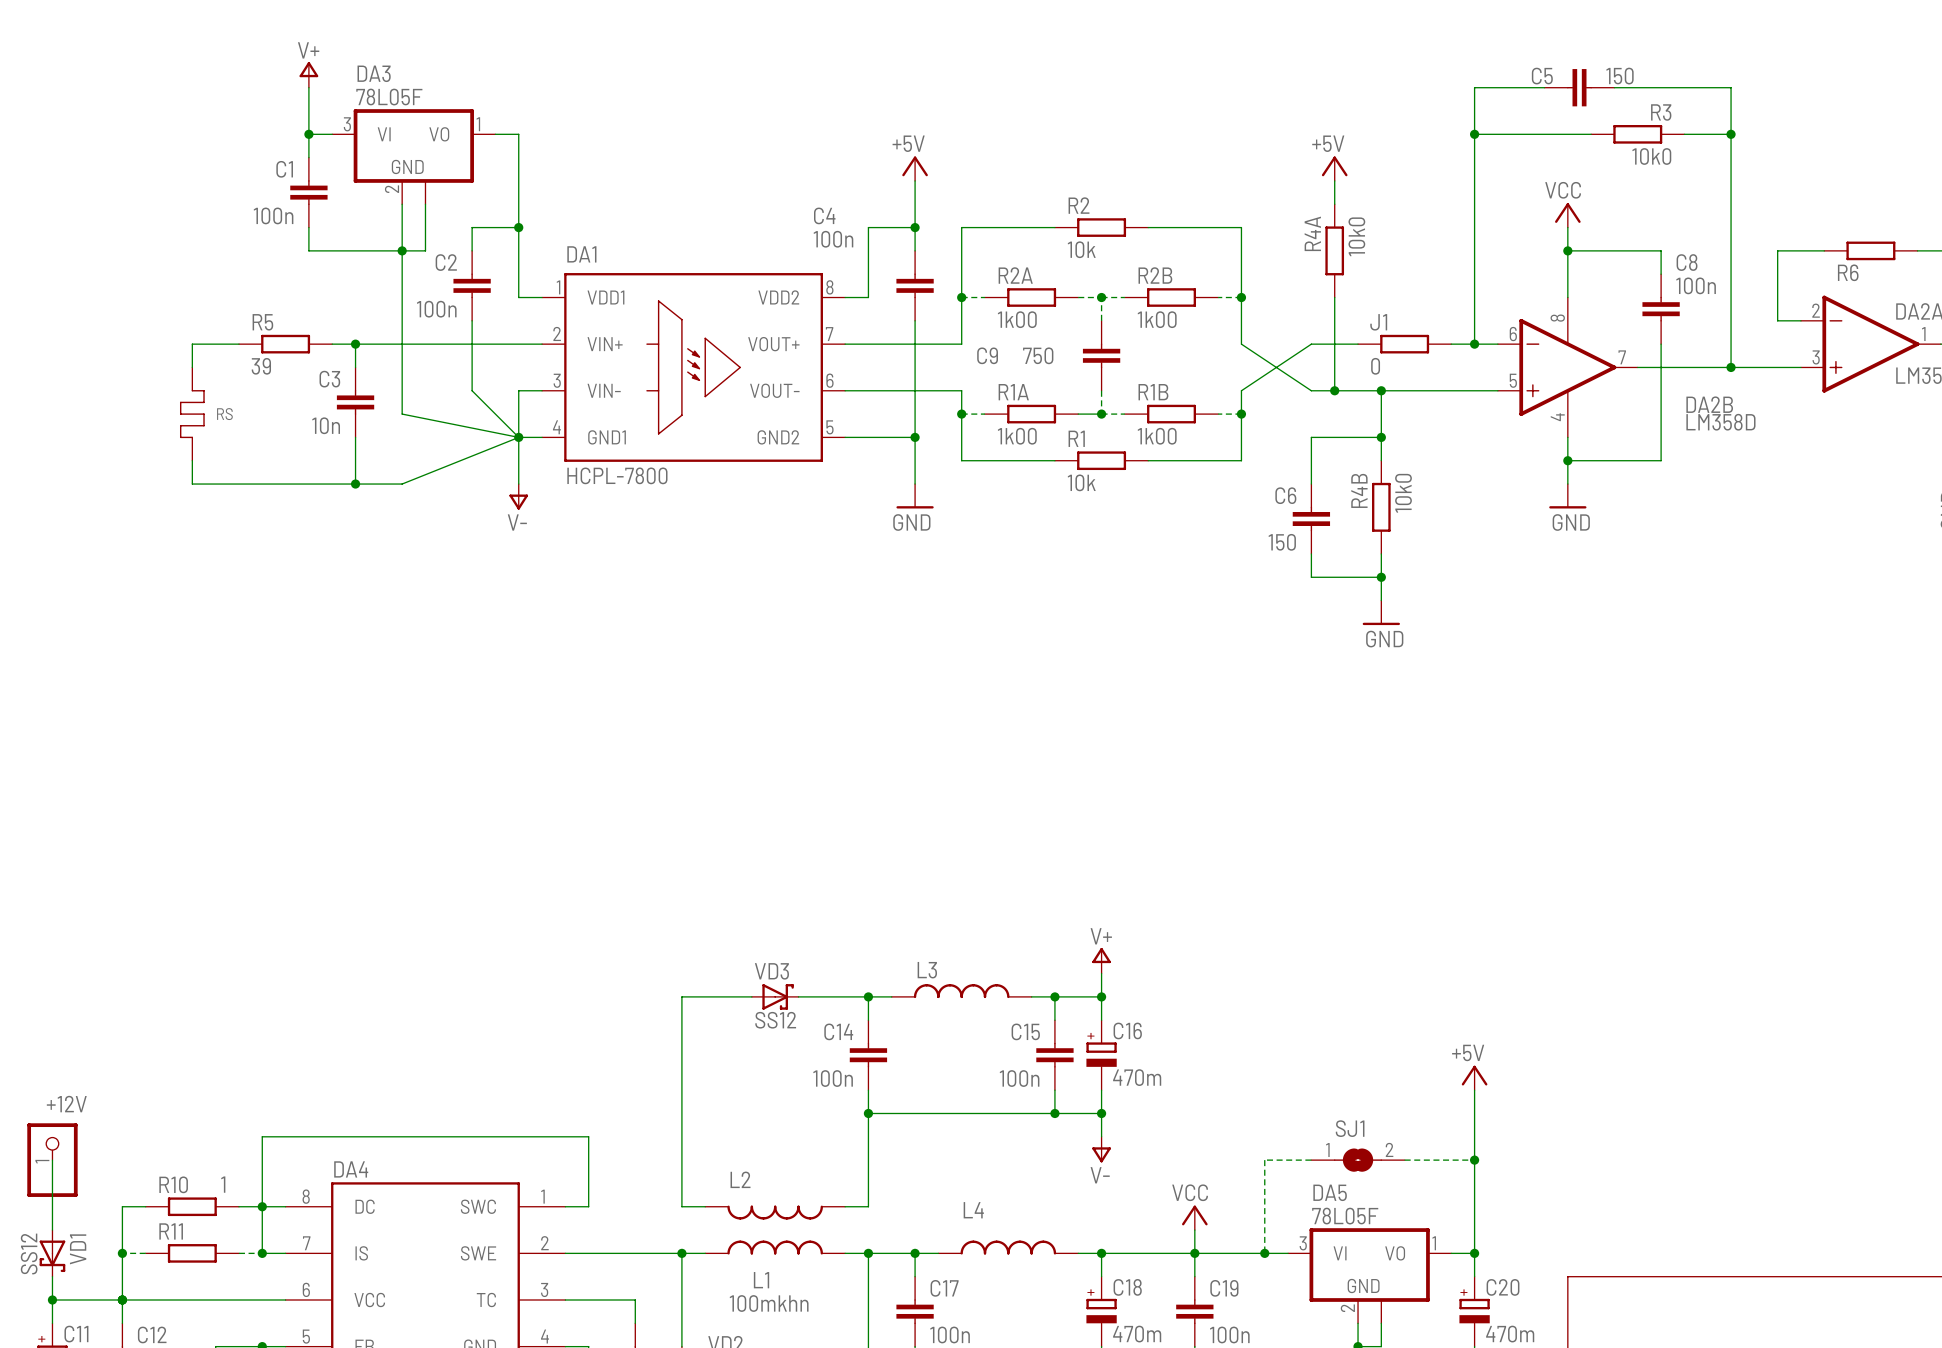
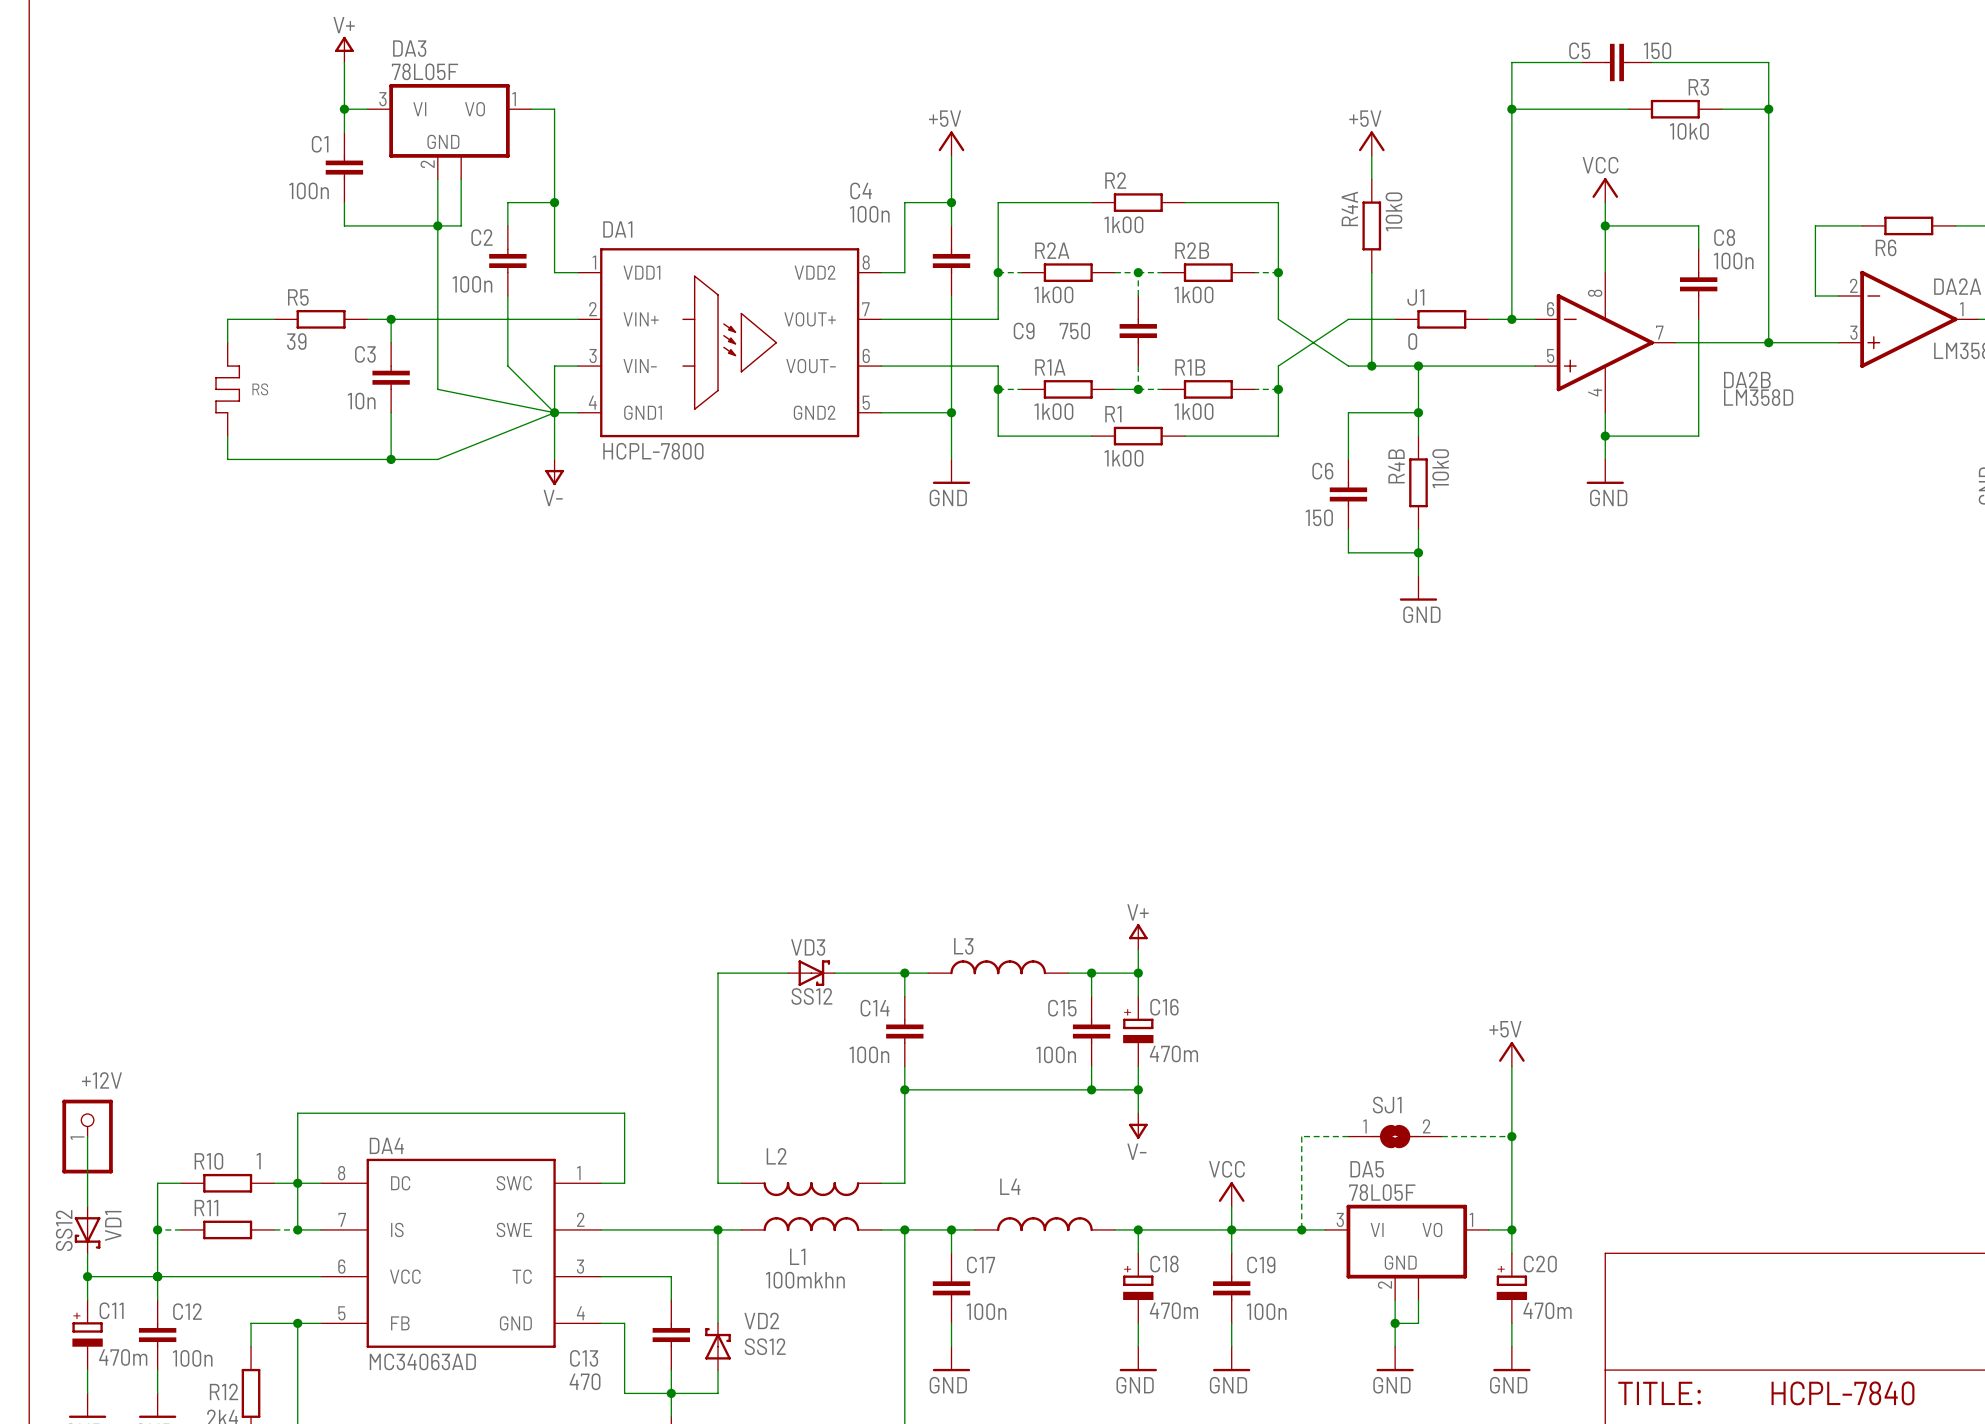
R2 value: 10k (1081, 249) -> 1k00 (1123, 224)
R1 value: 10k (1081, 482) -> 1k00 (1123, 458)

